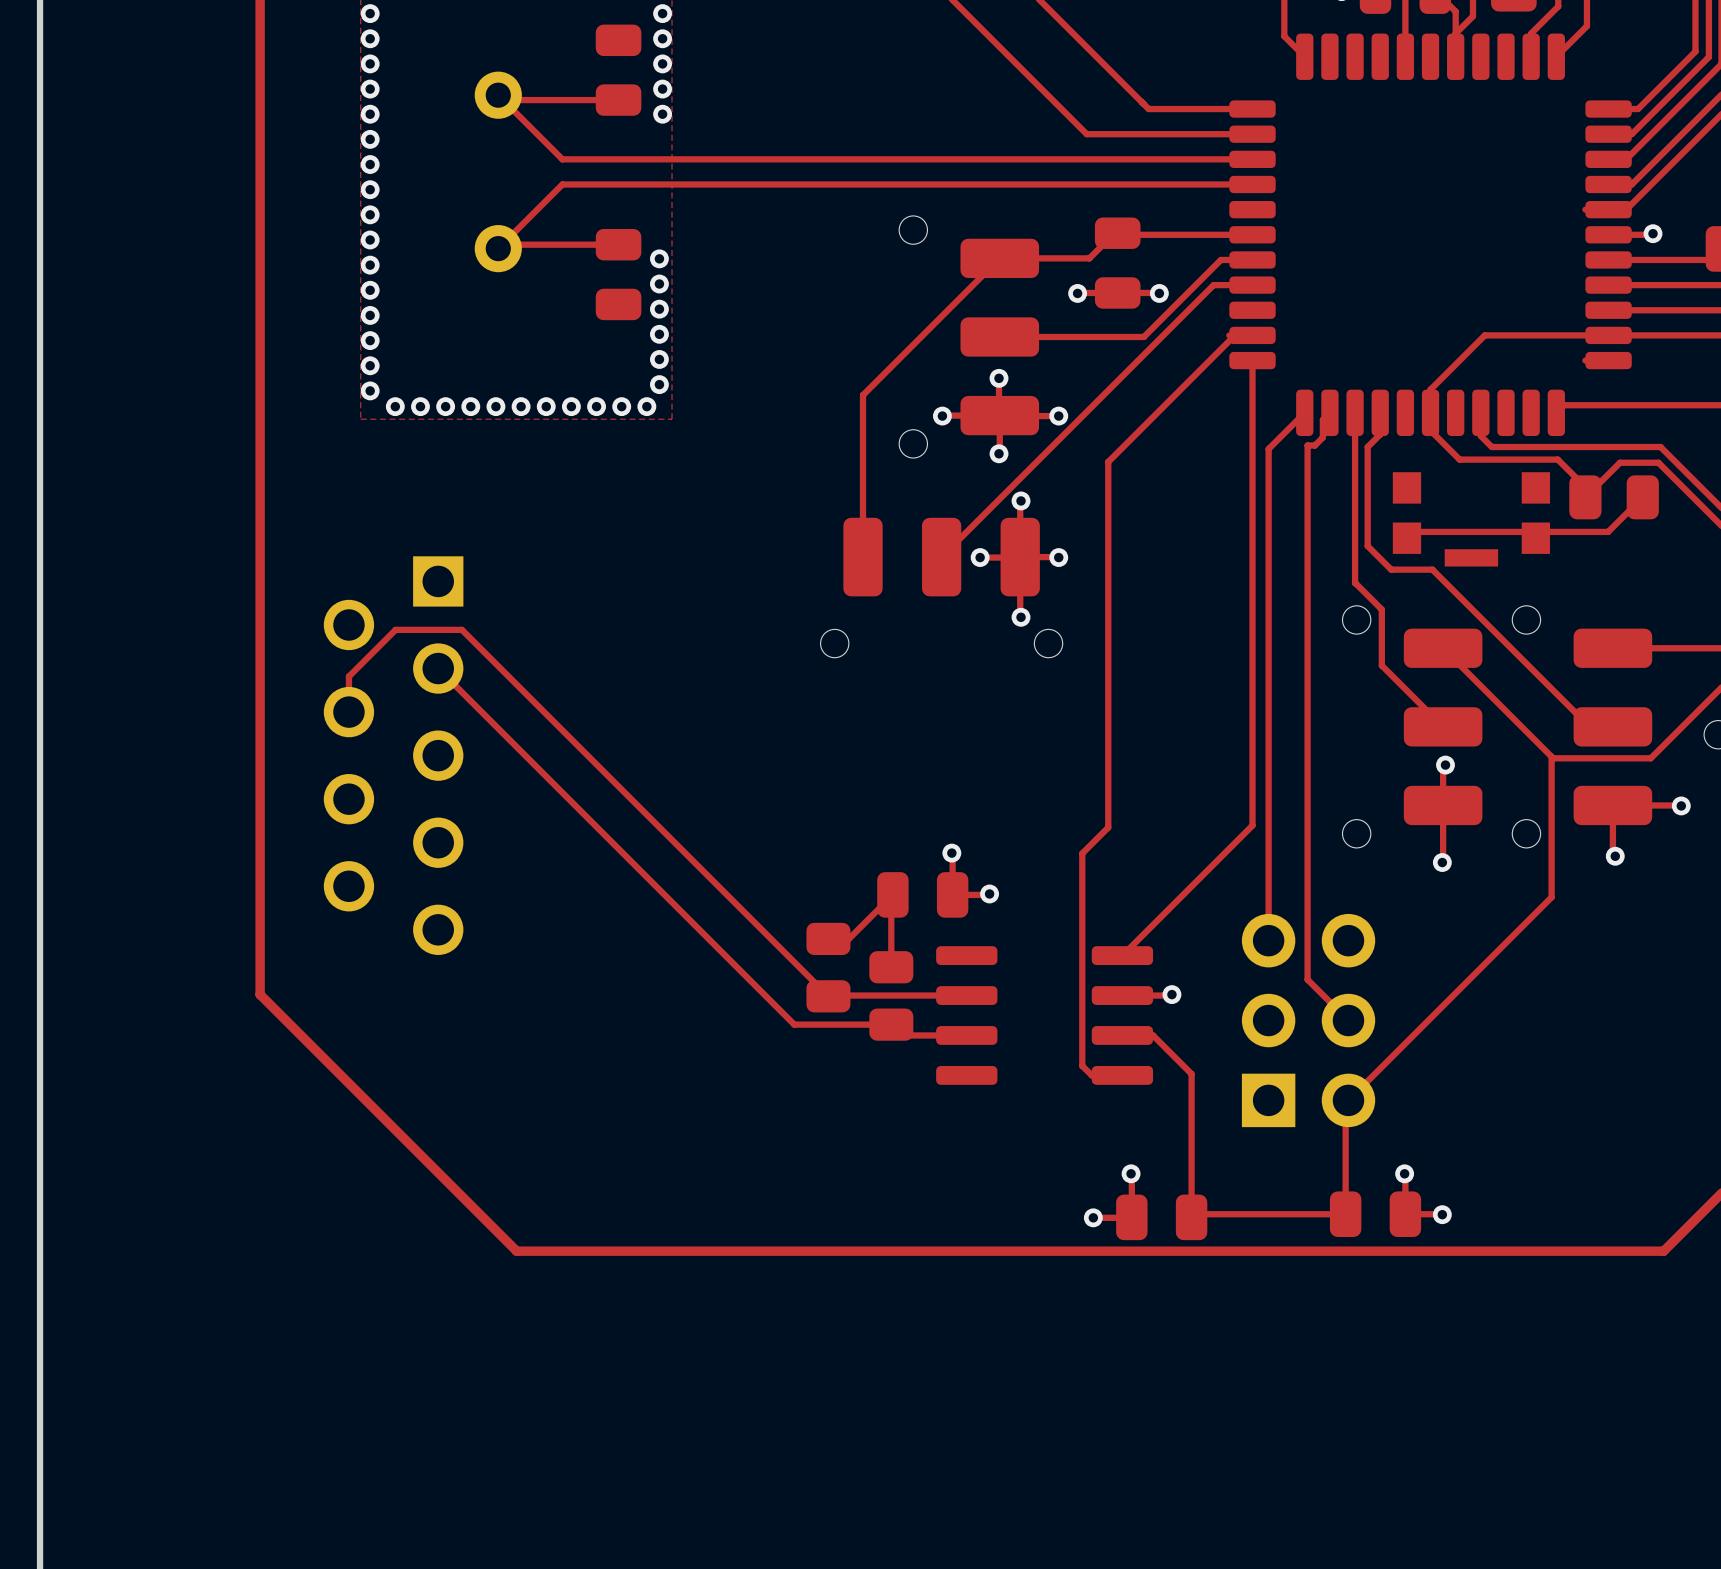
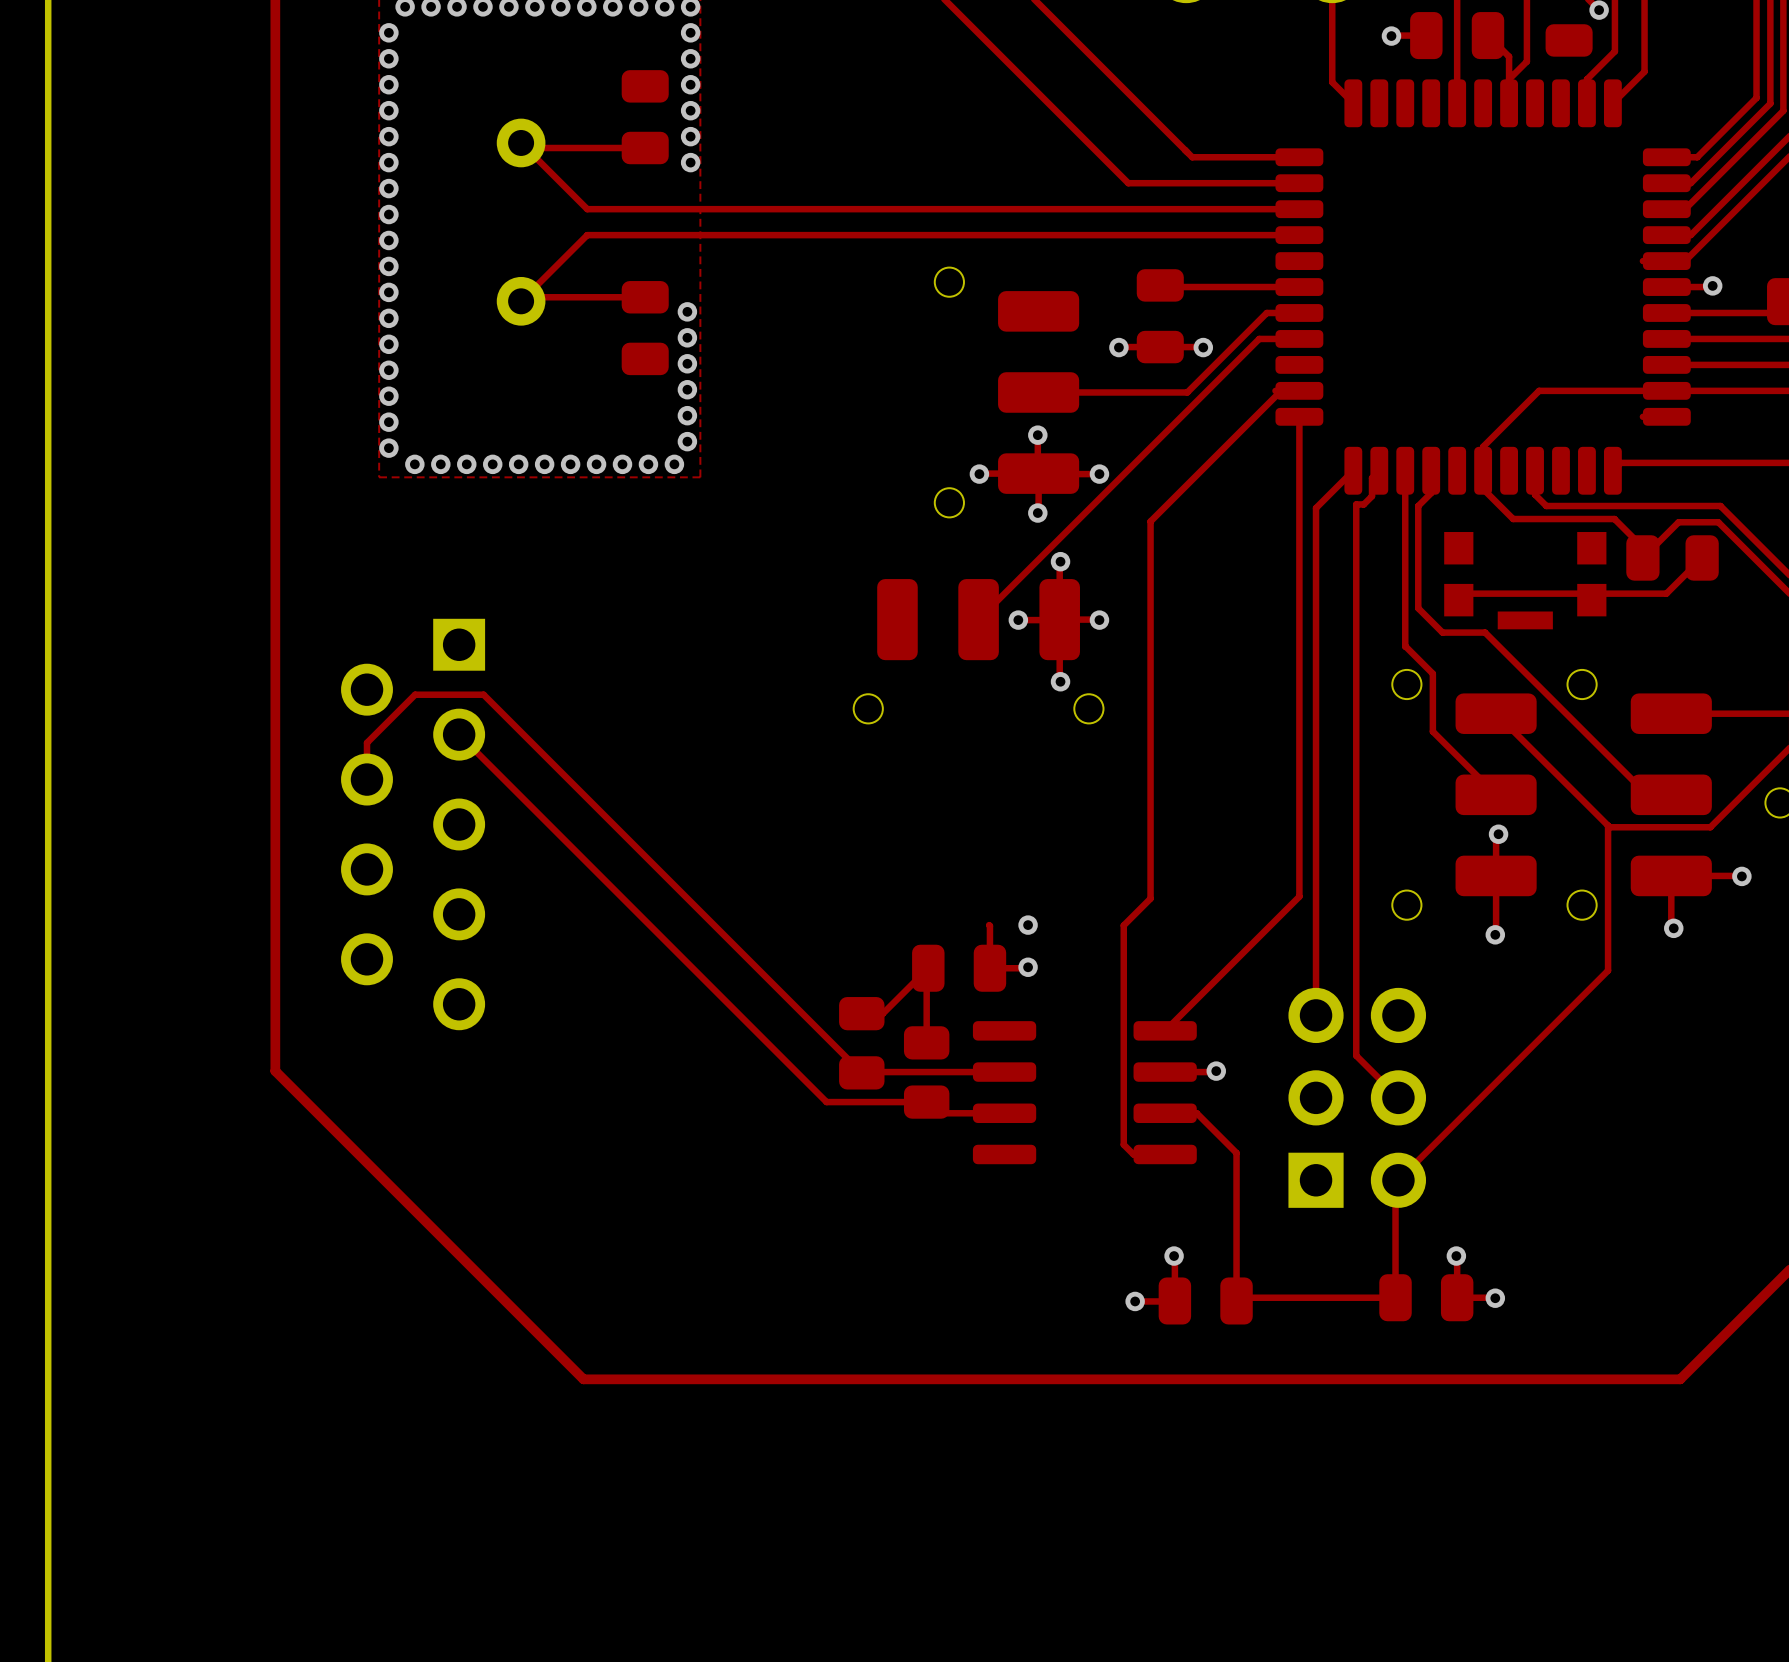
top track: (1114, 233) (1089, 258) (999, 258) (863, 395) (863, 557) -> none
via position: (951, 853) -> (1028, 925)
top track: (1663, 1251) (516, 1251) -> (1723, 1335) (1680, 1379) (583, 1379) (540, 1335)

